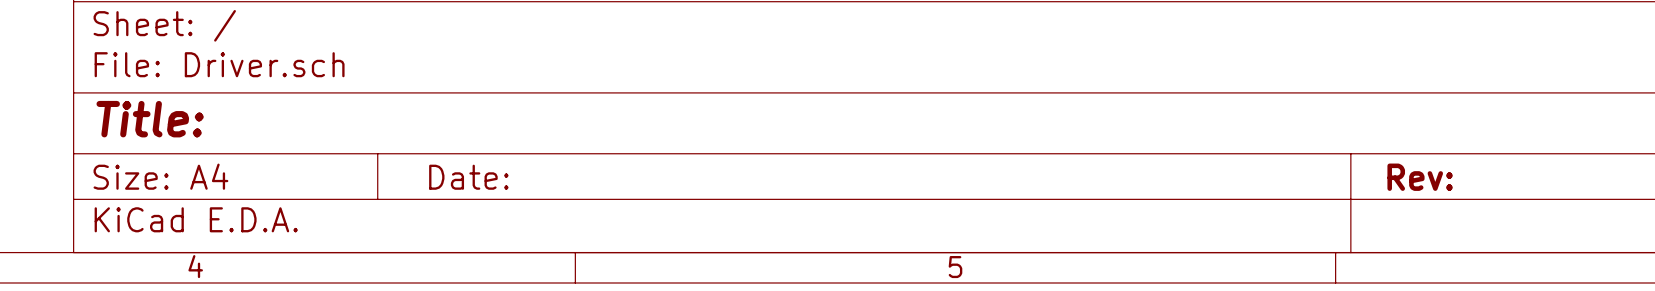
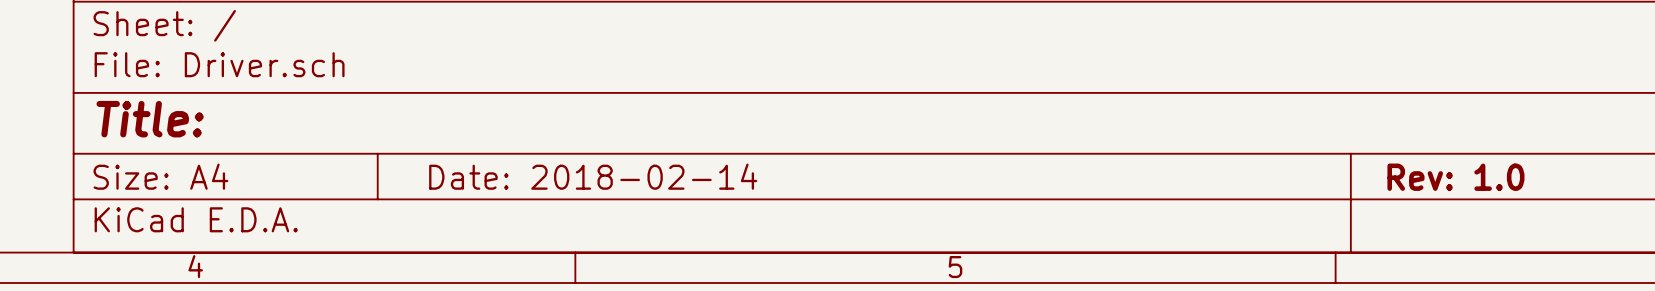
title block: Date: (468, 177) -> Date: 2018-02-14 (593, 176)
title block: Rev: (1420, 177) -> Rev: 1.0 (1455, 177)

